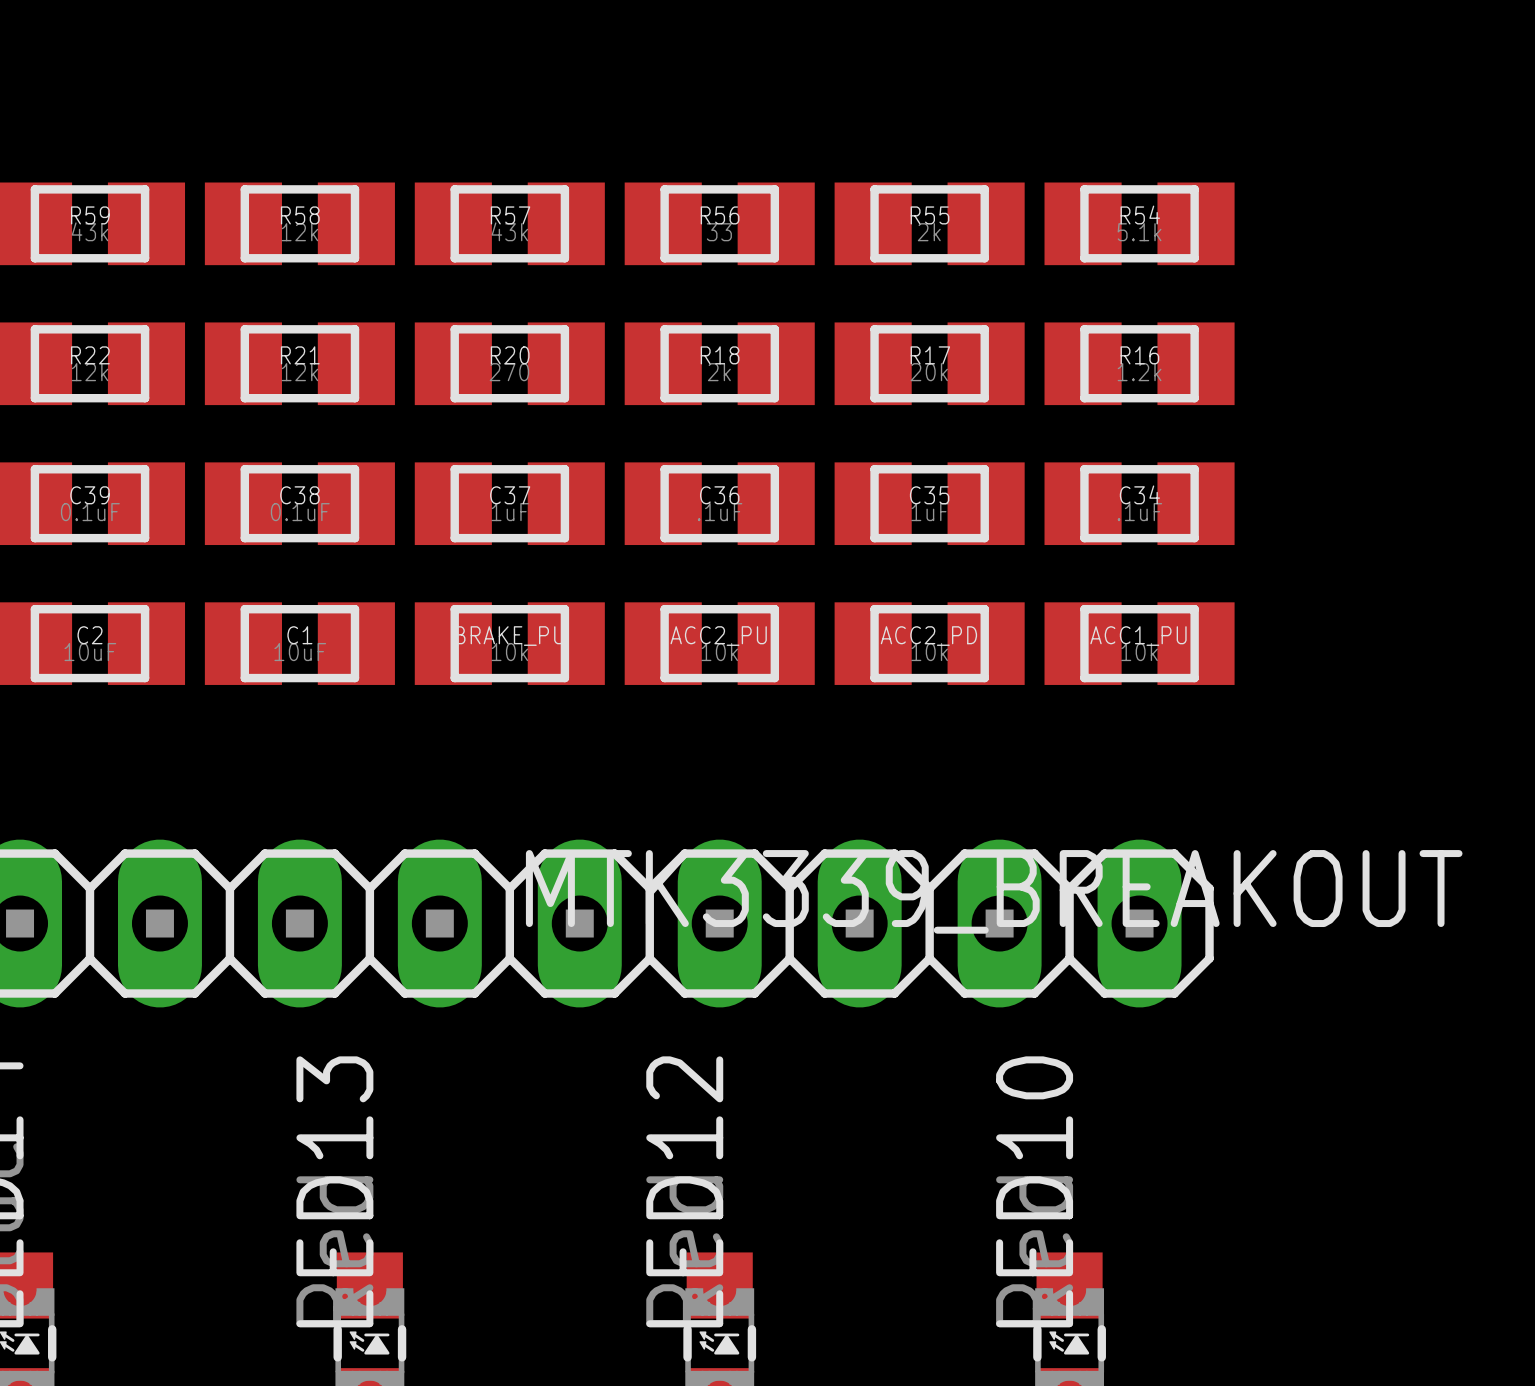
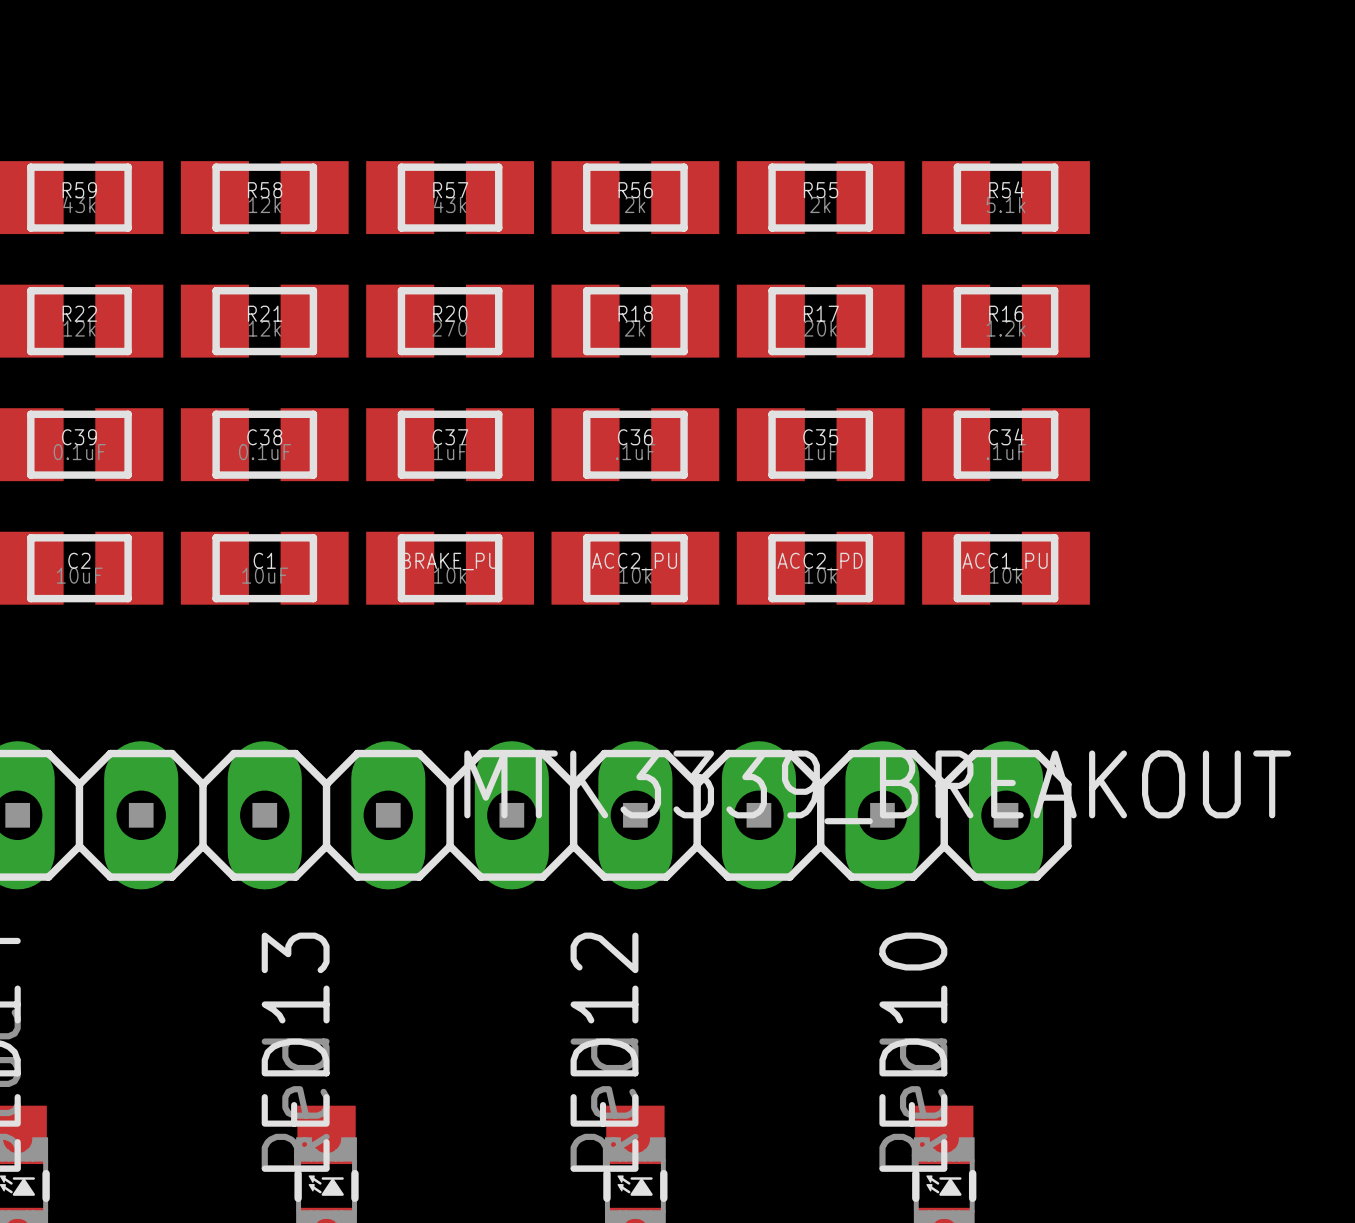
R56 value: 33 (719, 232) -> 2k (635, 205)

